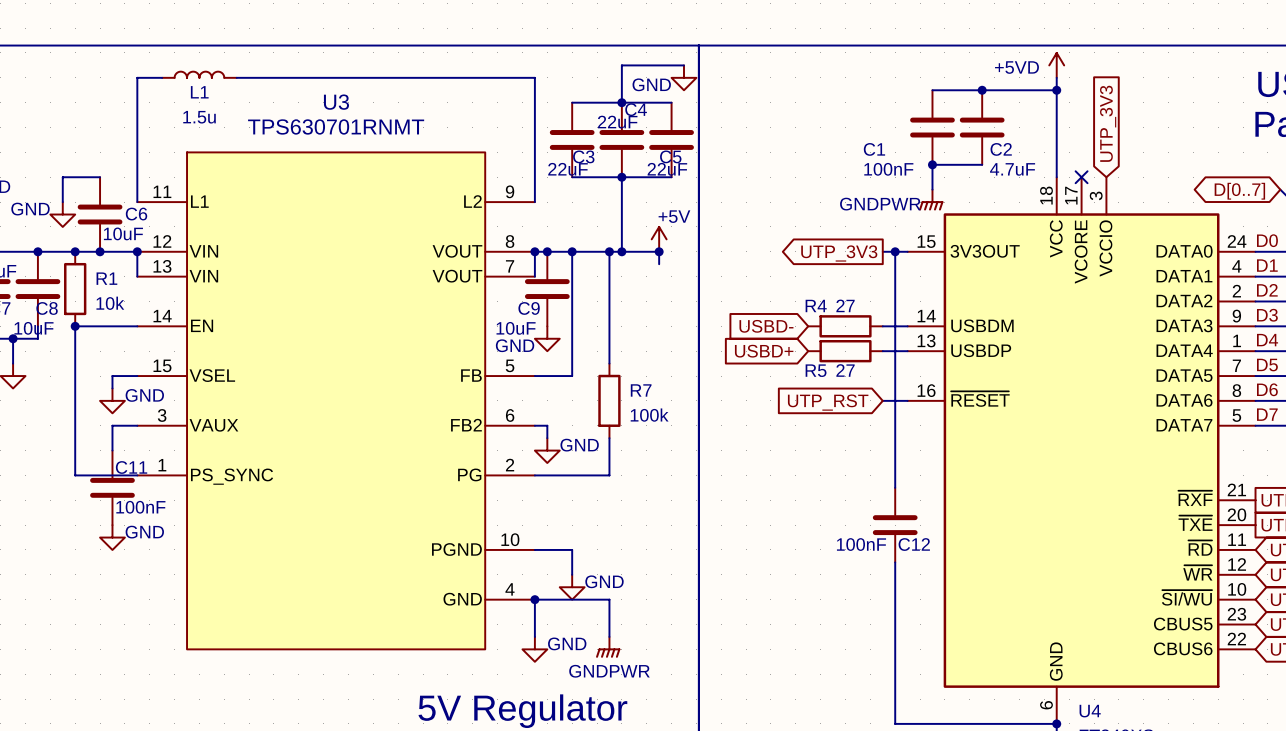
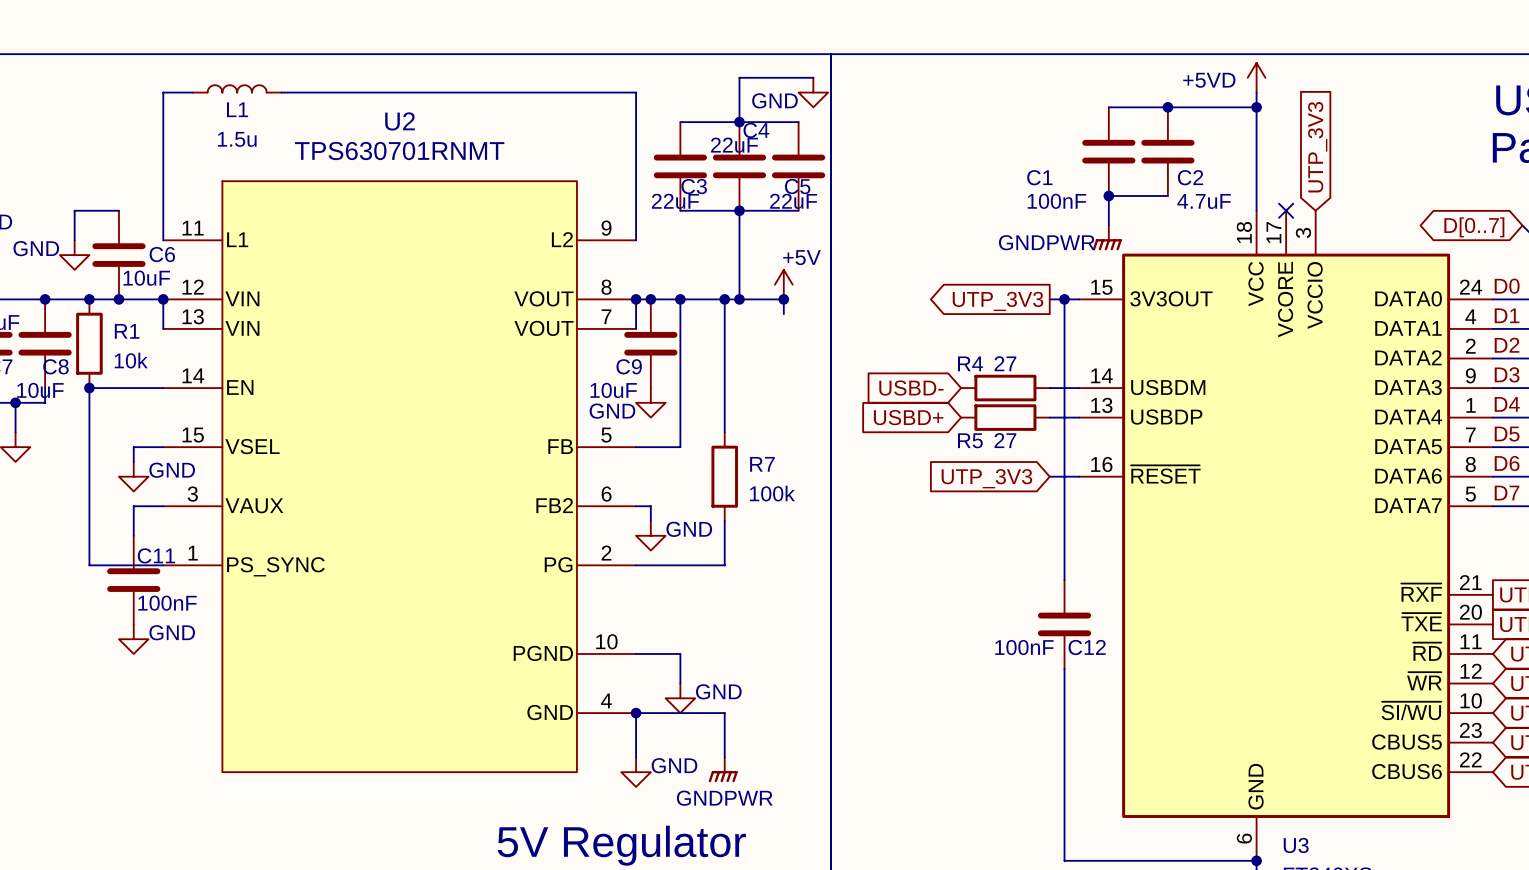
U3 name: U3 (336, 102) -> U2 (400, 121)
global label: UTP_RST (828, 402) -> UTP_3V3 (986, 478)
U4 name: U4 (1090, 711) -> U3 (1296, 845)

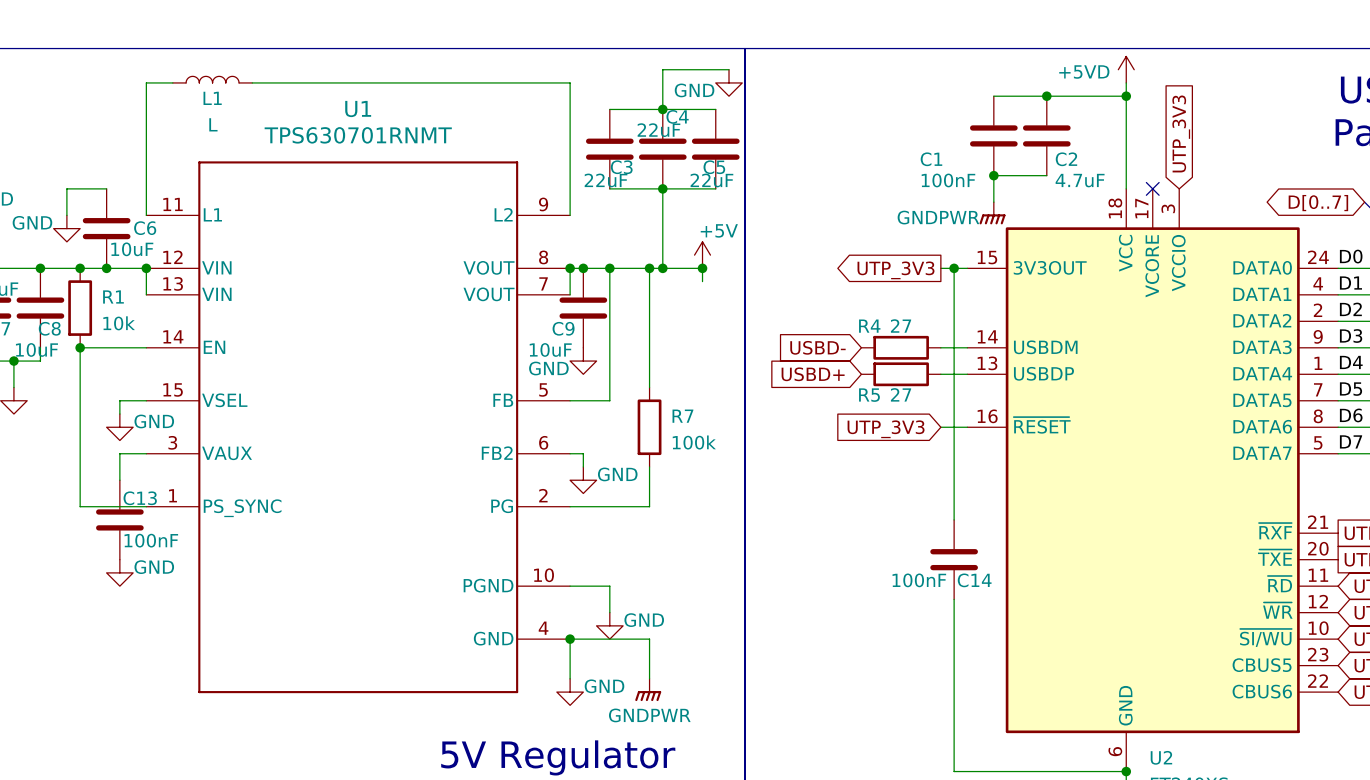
L1 value: 1.5u (237, 139) -> L (213, 124)
U2: TPS630701RNMT (399, 476) -> none
U1: none -> TPS630701RNMT (358, 427)
C11 name: C11 (156, 555) -> C13 (140, 498)
C12 name: C12 (1087, 647) -> C14 (974, 580)
U3 name: U3 (1296, 845) -> U2 (1161, 757)

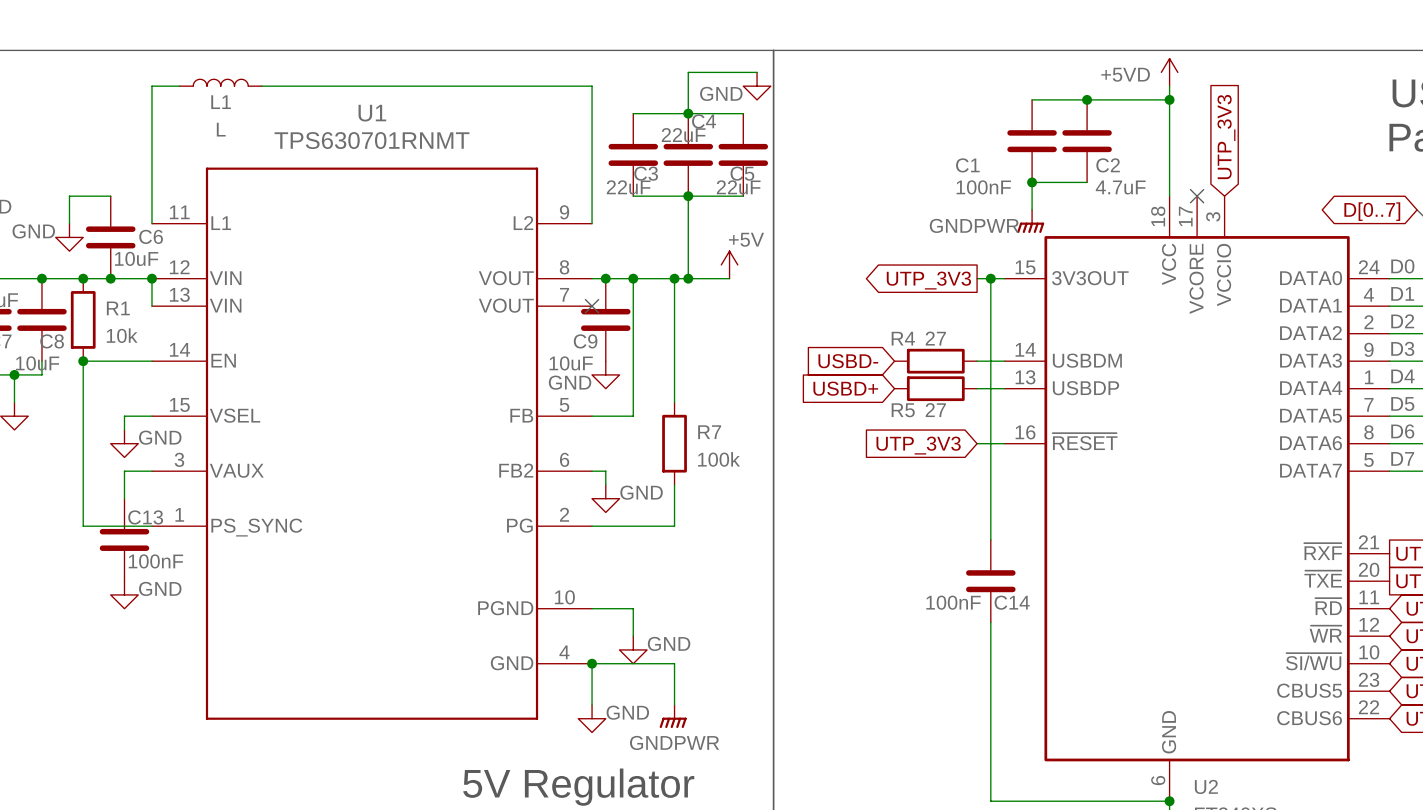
wire: (570, 268) (570, 294) -> none
junction: (570, 268) -> none
wire: (702, 268) (702, 281) -> none
junction: (702, 268) -> none
no-connect mark: none -> (592, 306)

